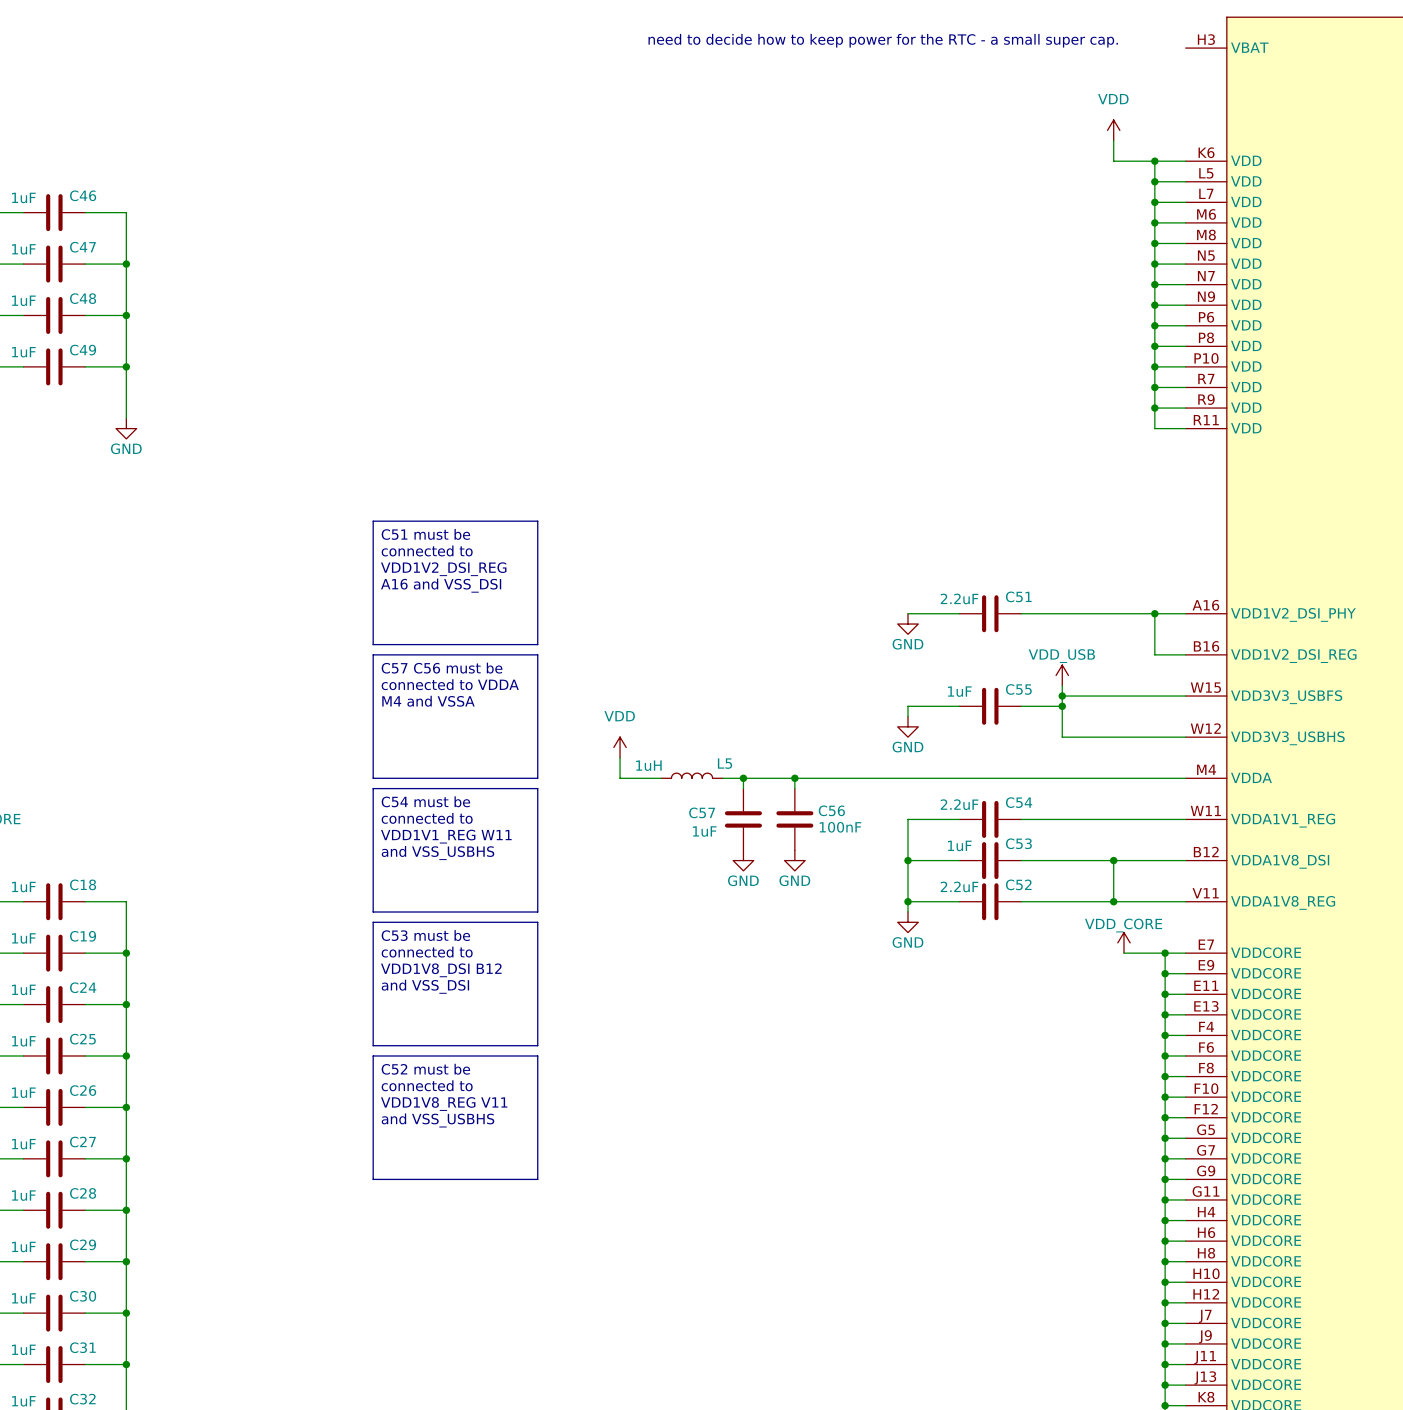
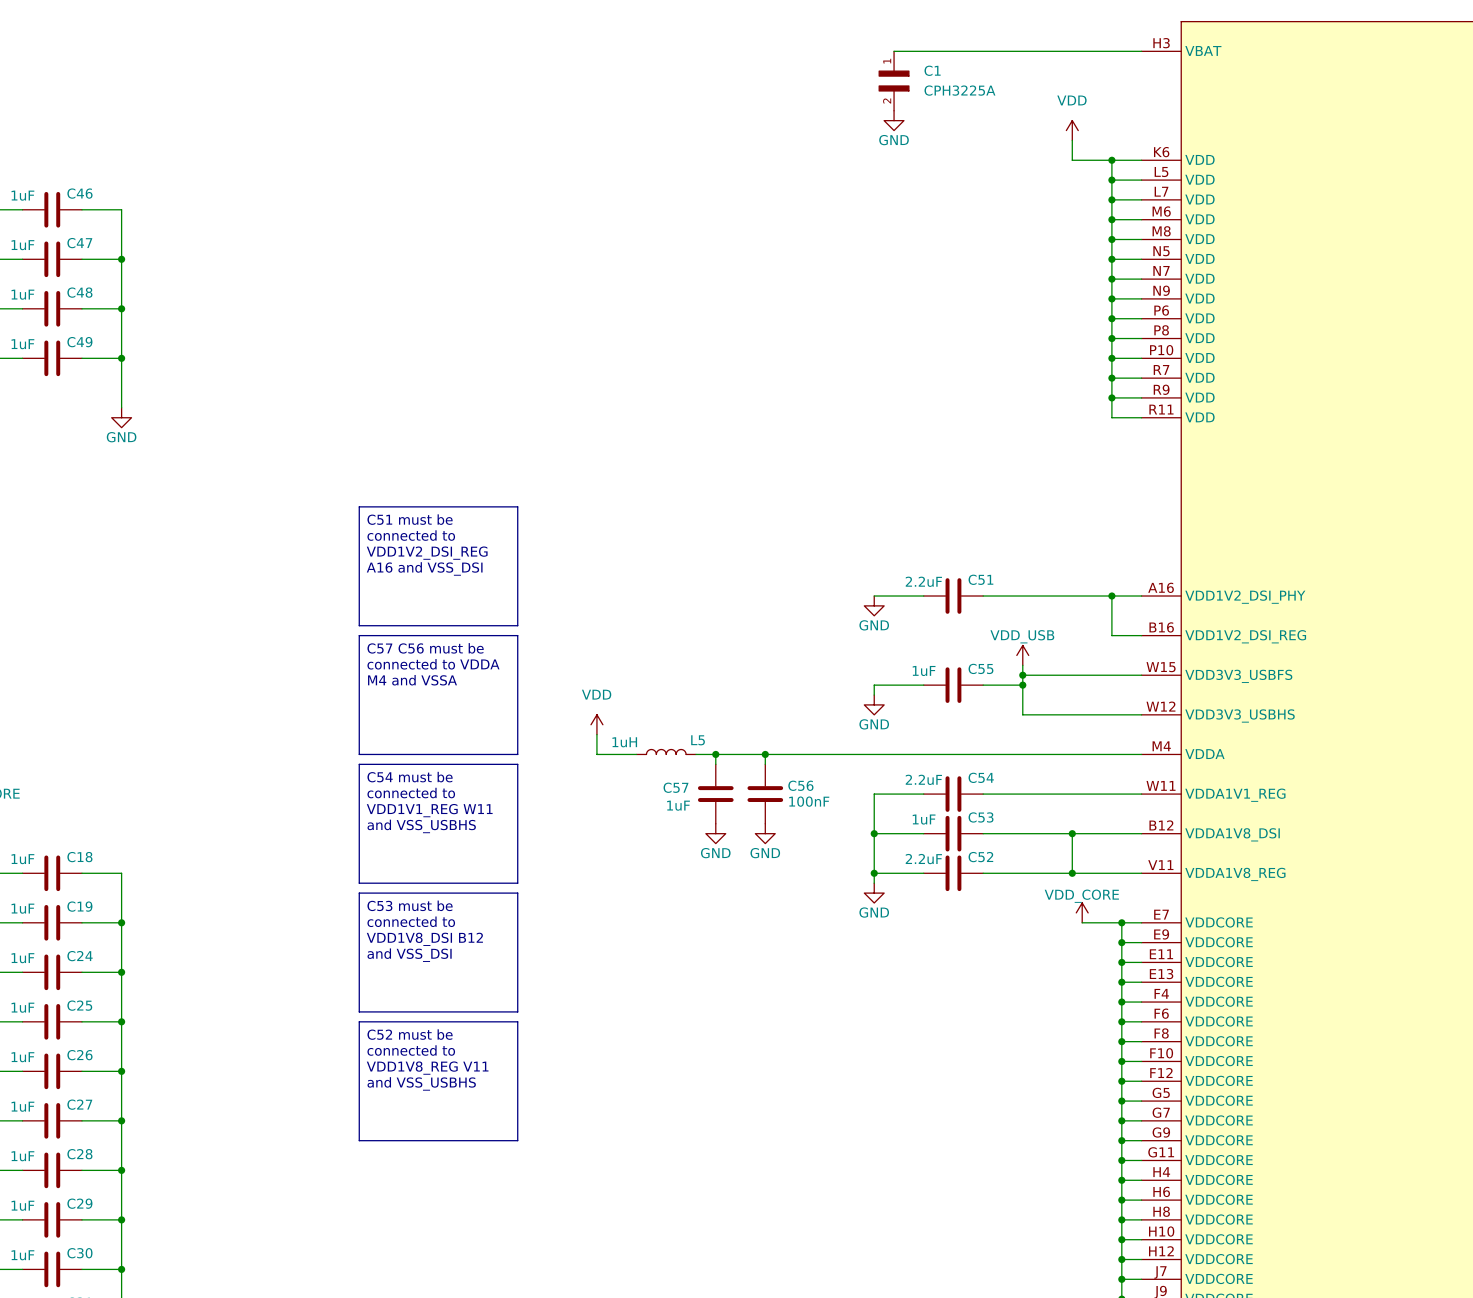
text: need to decide how to keep power for the RTC - a small super cap. (883, 40) -> none
wire: none -> (894, 51) (1141, 51)
C1: none -> CPH3225A (894, 81)
power symbol: none -> GND (894, 120)

